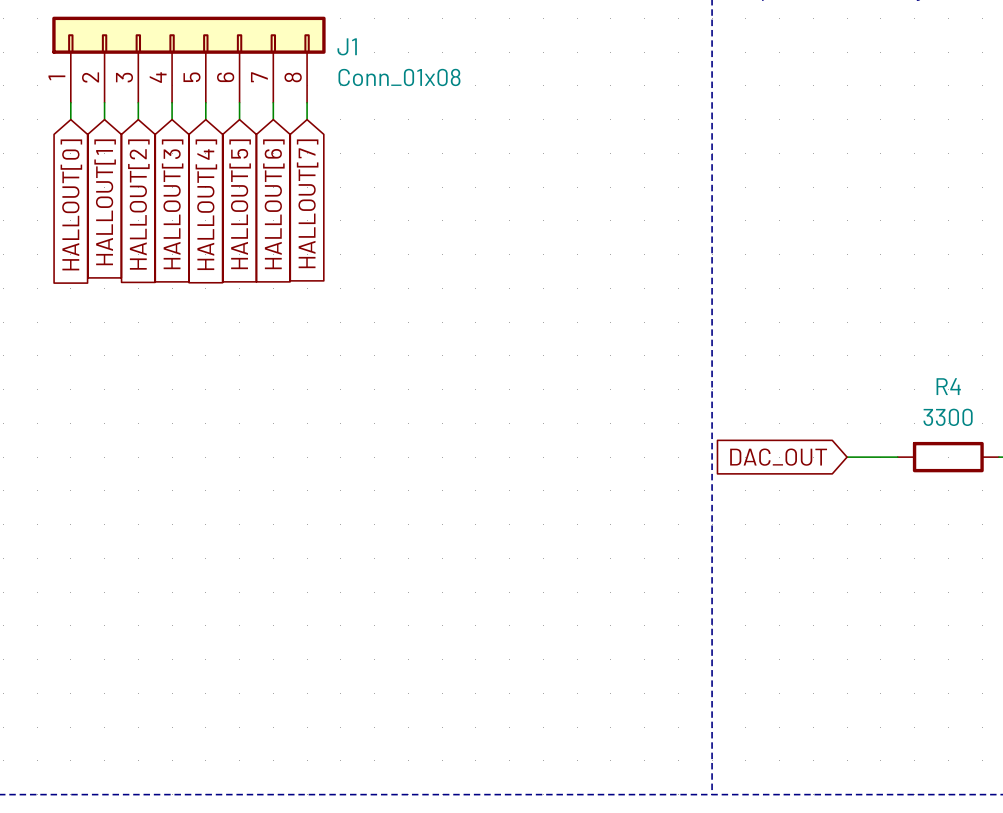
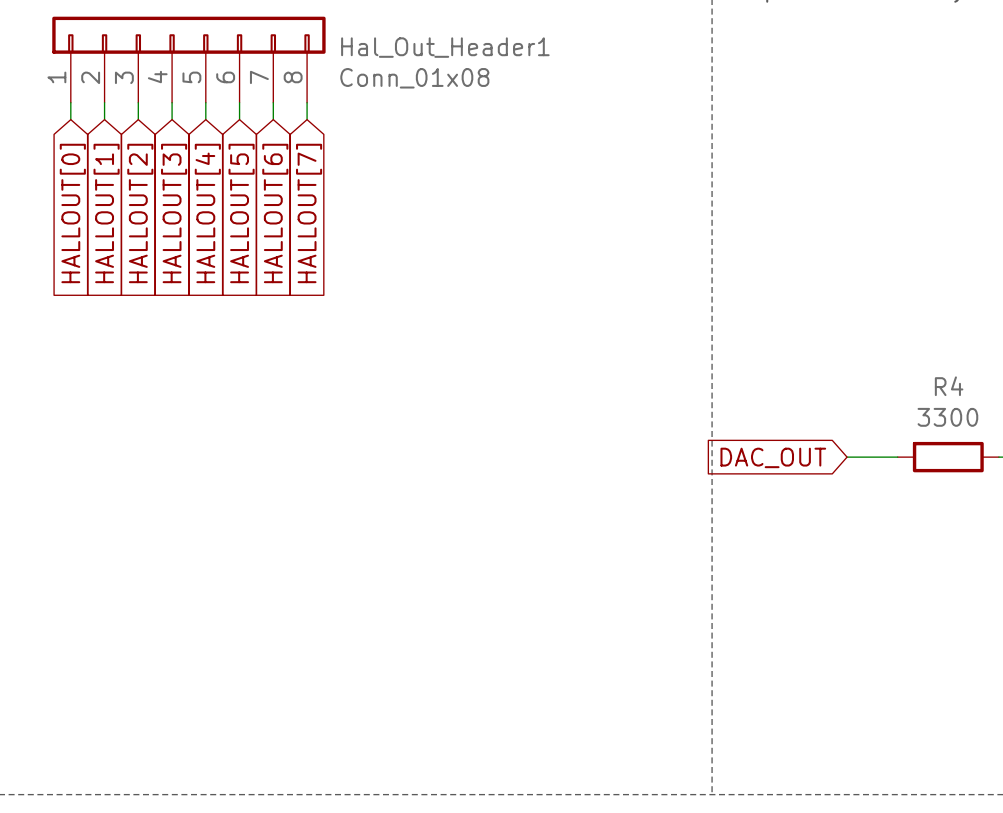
J1 name: J1 (347, 46) -> Hal_Out_Header1 (445, 47)

